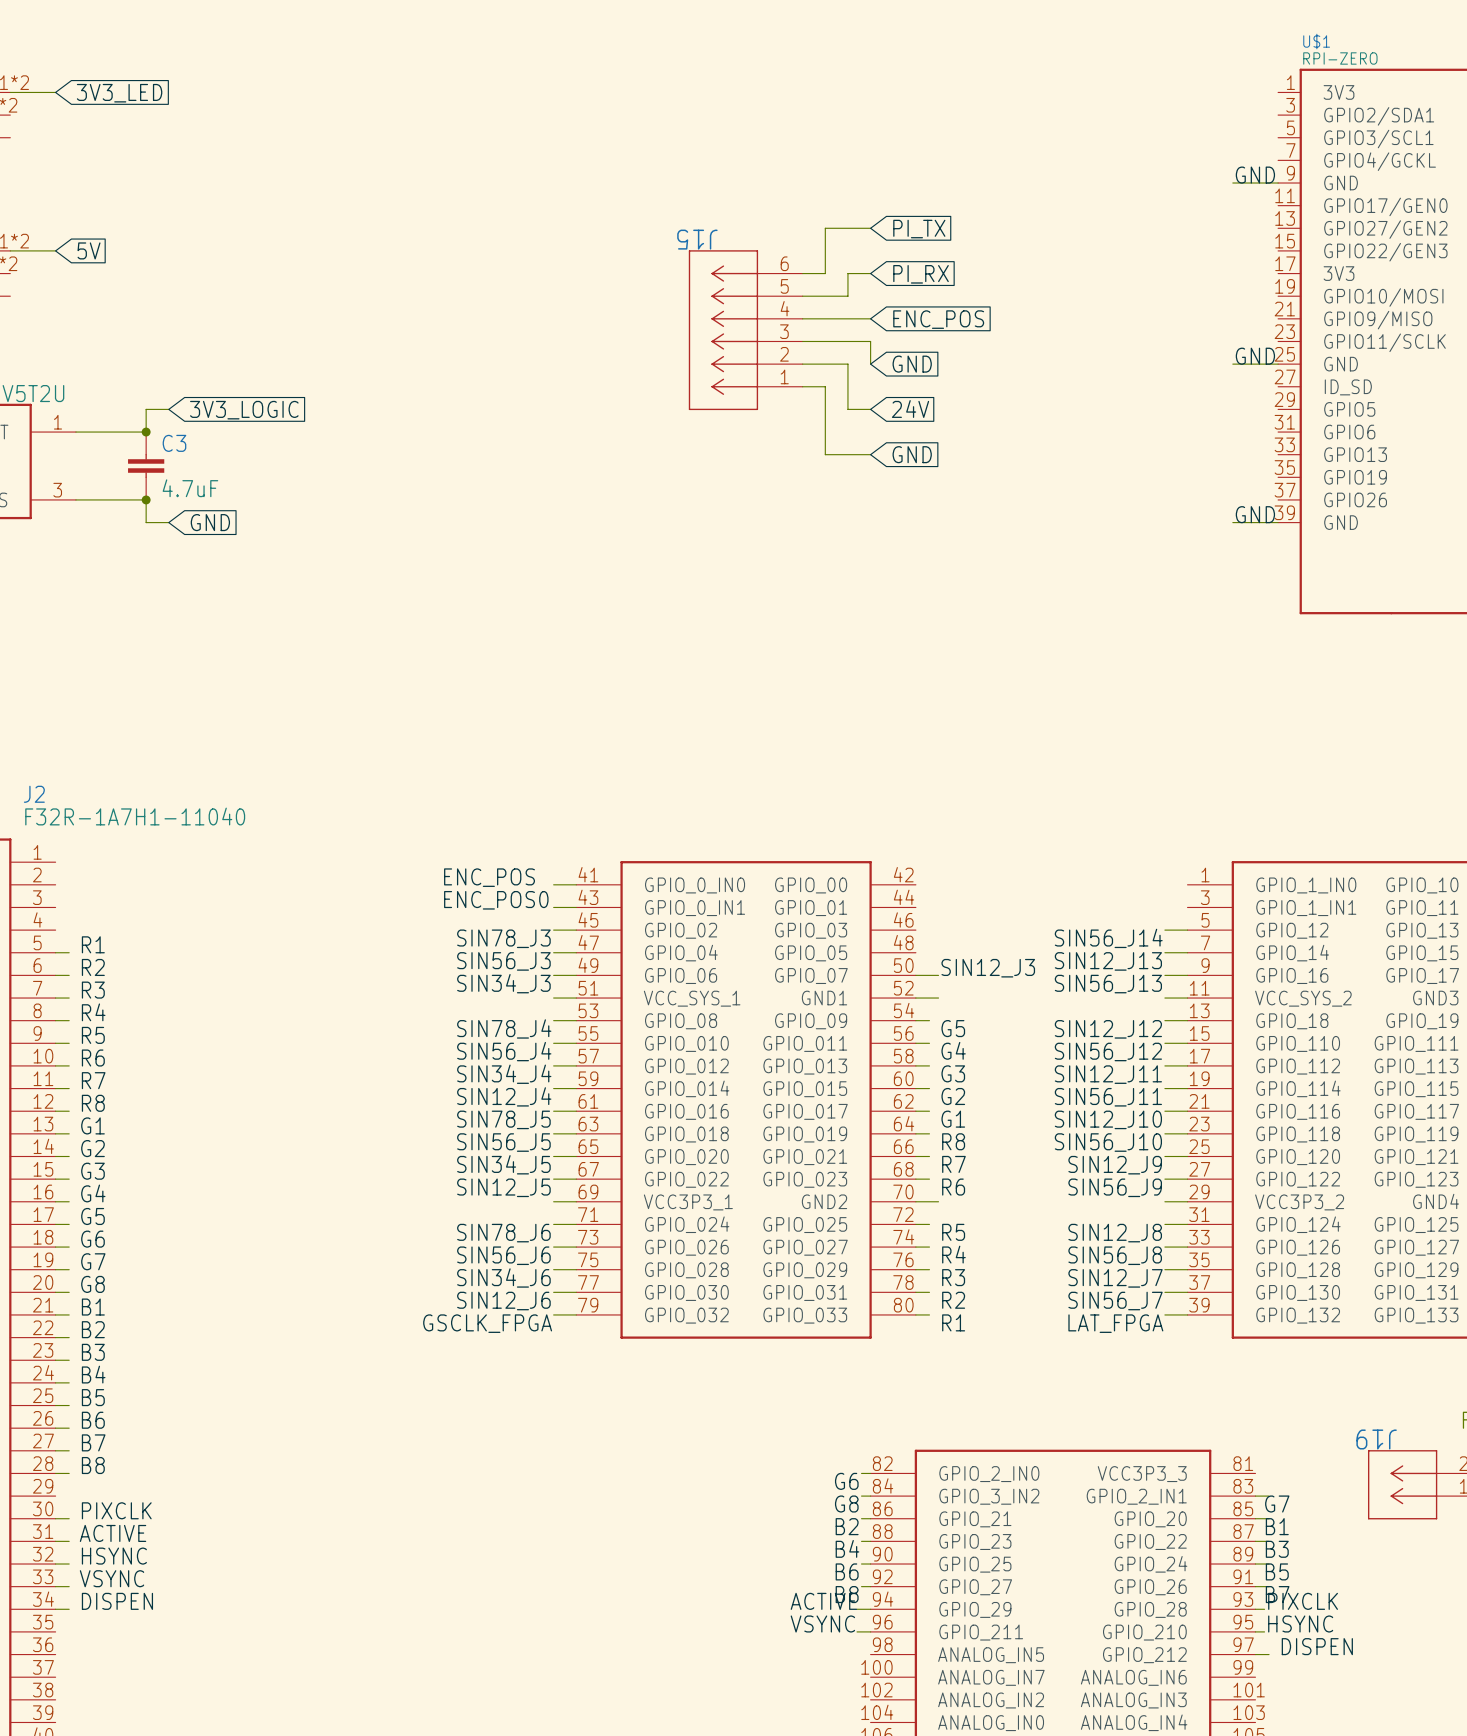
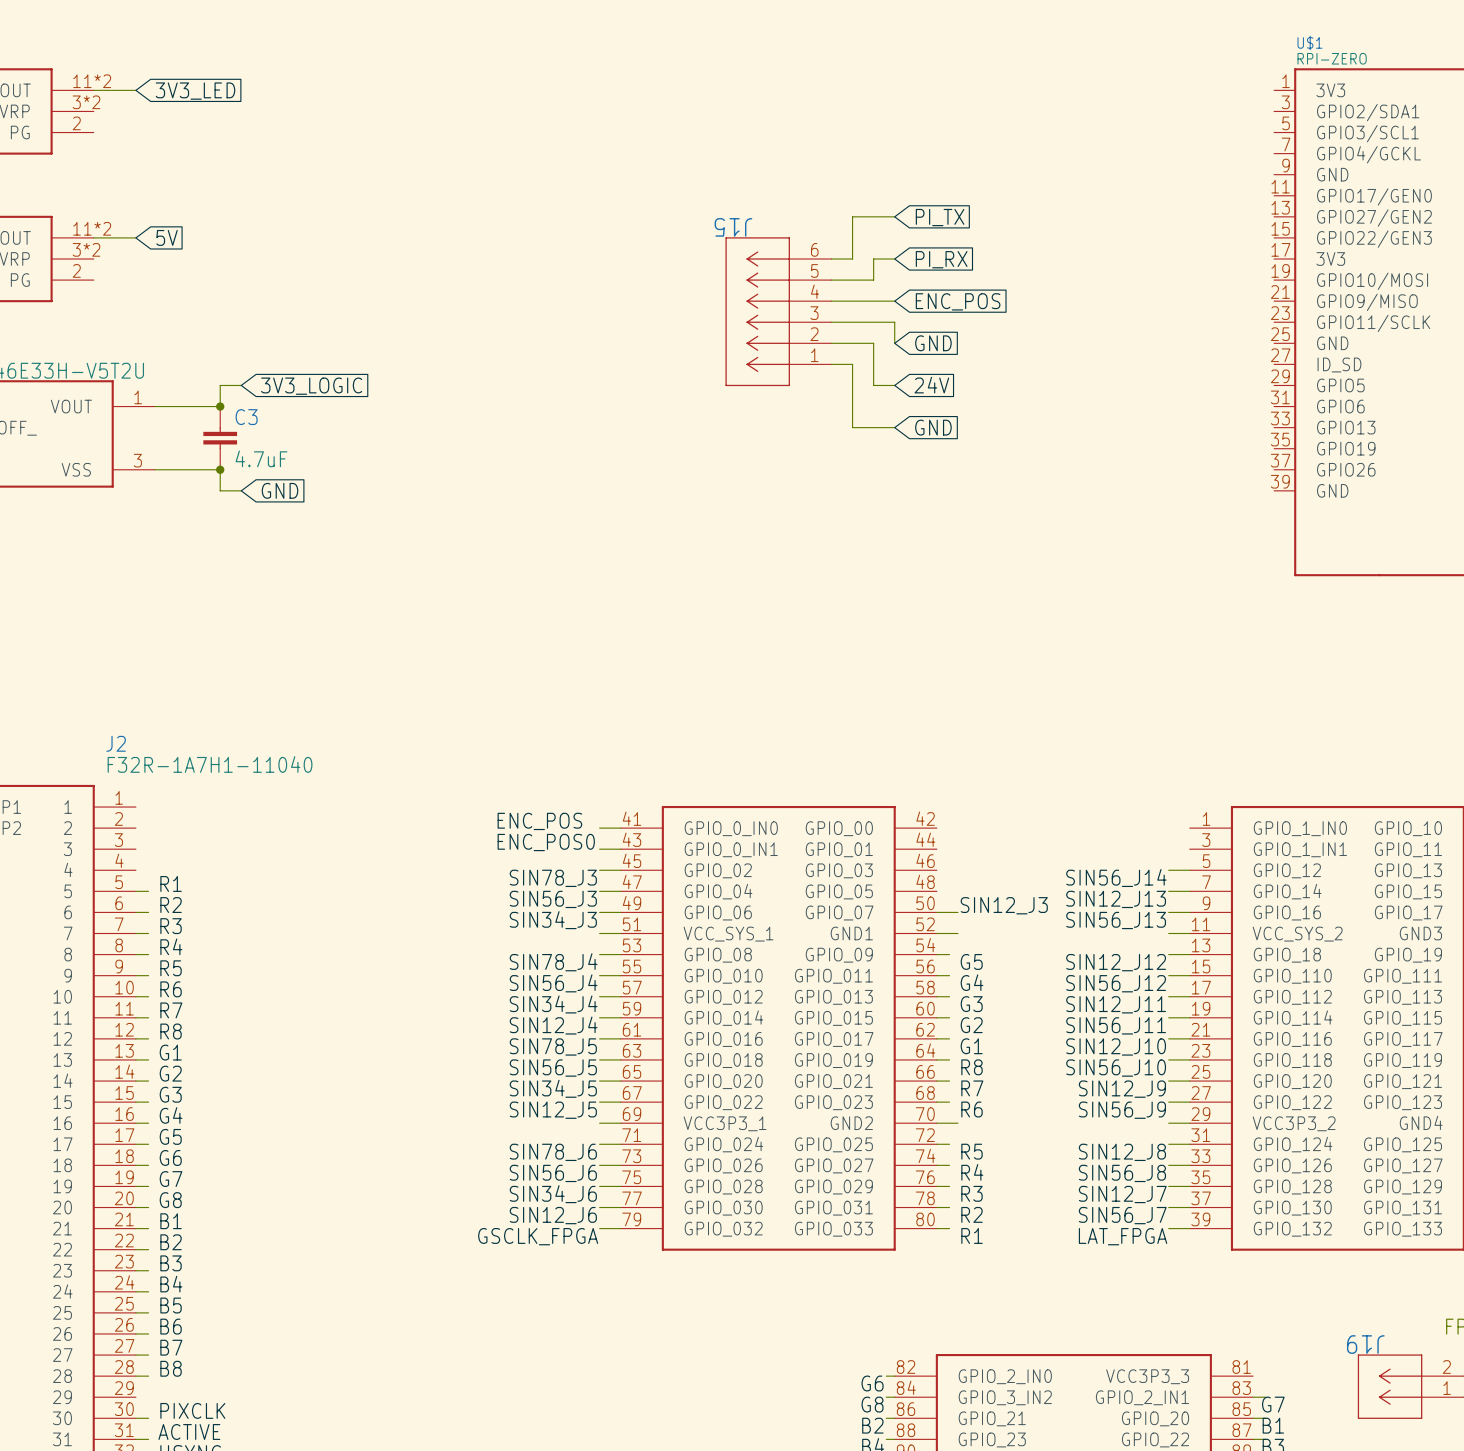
label: GND (1255, 175) -> none
wire: (1232, 183) (1278, 183) -> none
label: GND (1255, 356) -> none
wire: (1232, 364) (1278, 364) -> none
label: GND (1255, 514) -> none
wire: (1232, 522) (1278, 522) -> none

